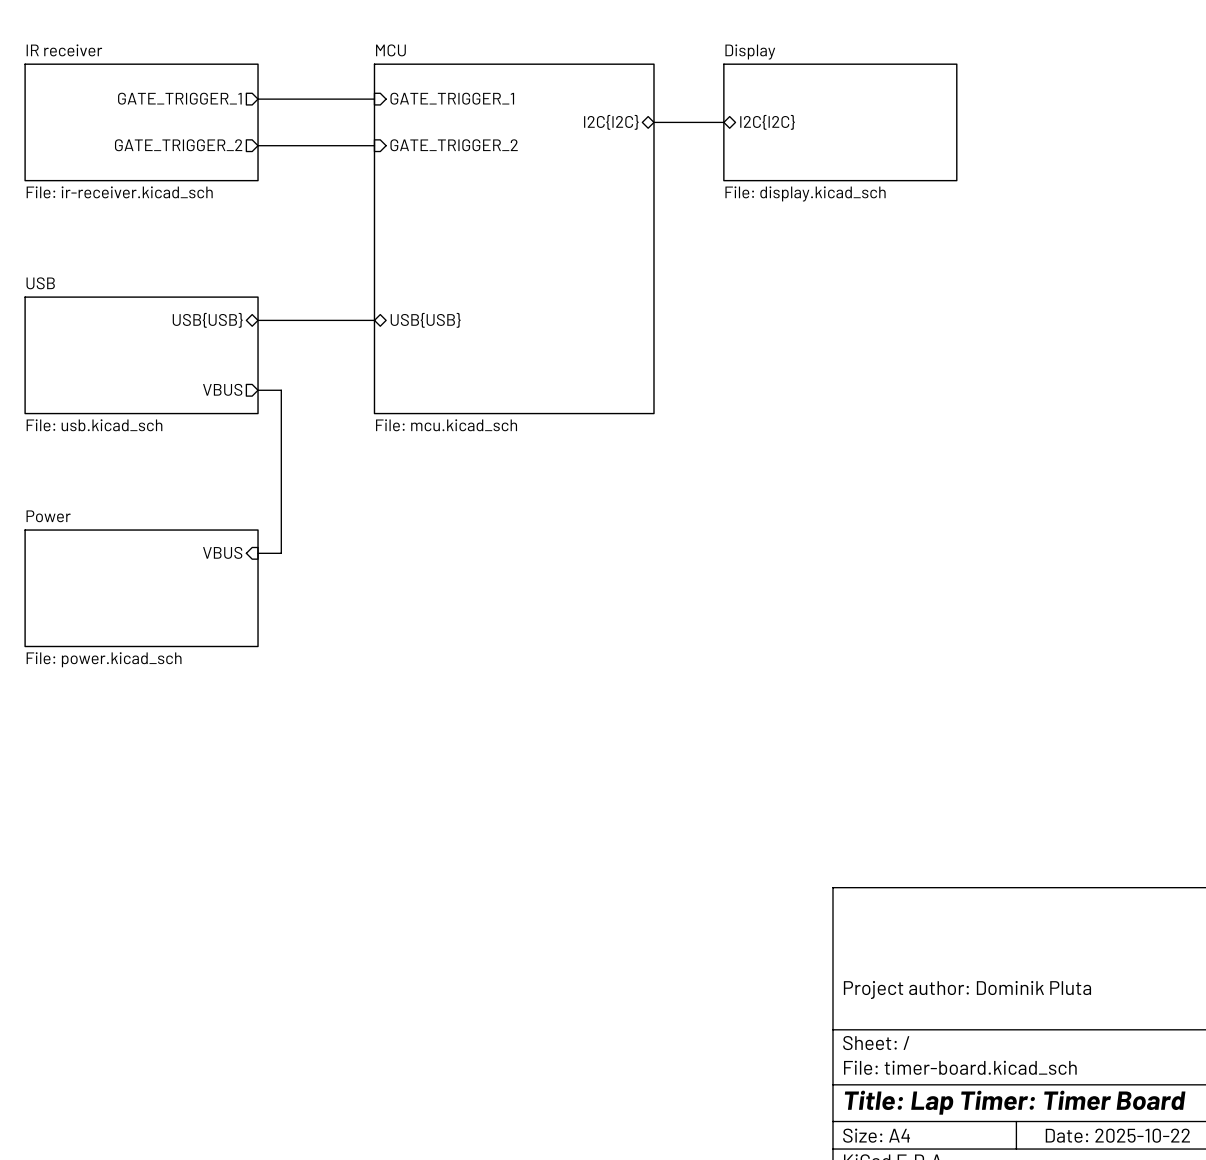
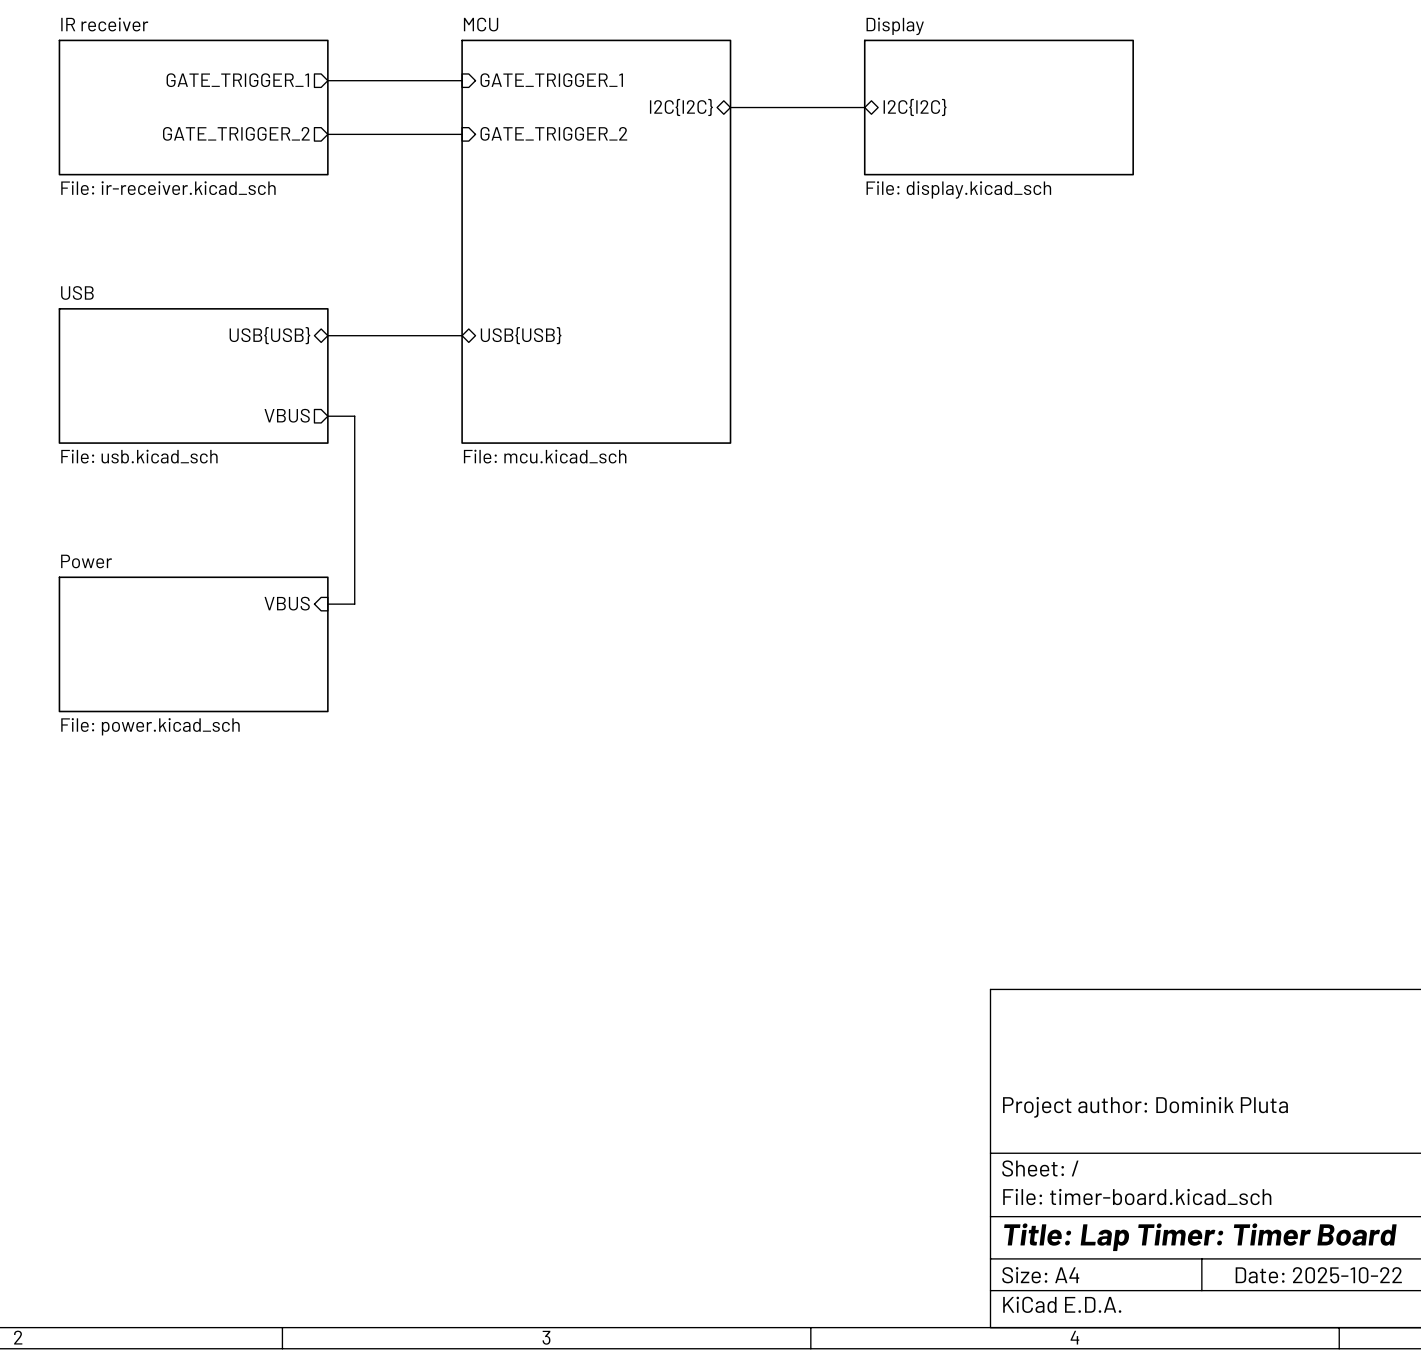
bus: none -> (730, 107) (784, 107)
sheet pin position: I2C{I2C} (611, 122) -> I2C{I2C} (681, 107)
sheet MCU: none -> File: mcu.kicad_sch (596, 241)
sheet MCU: File: mcu.kicad_sch (514, 238) -> none

